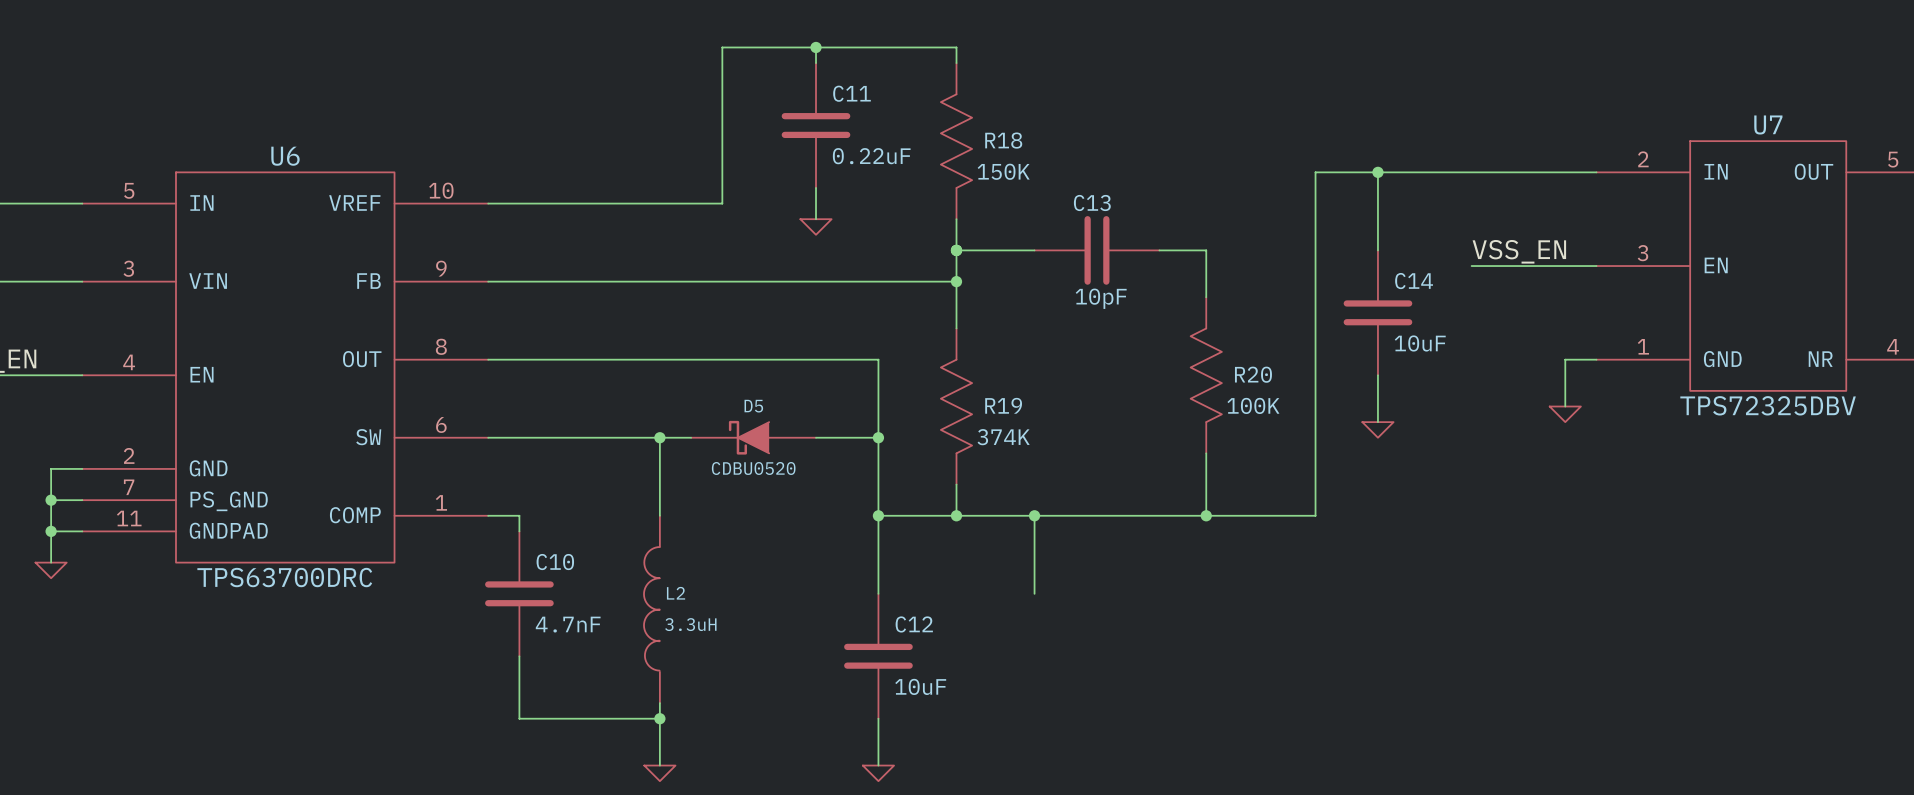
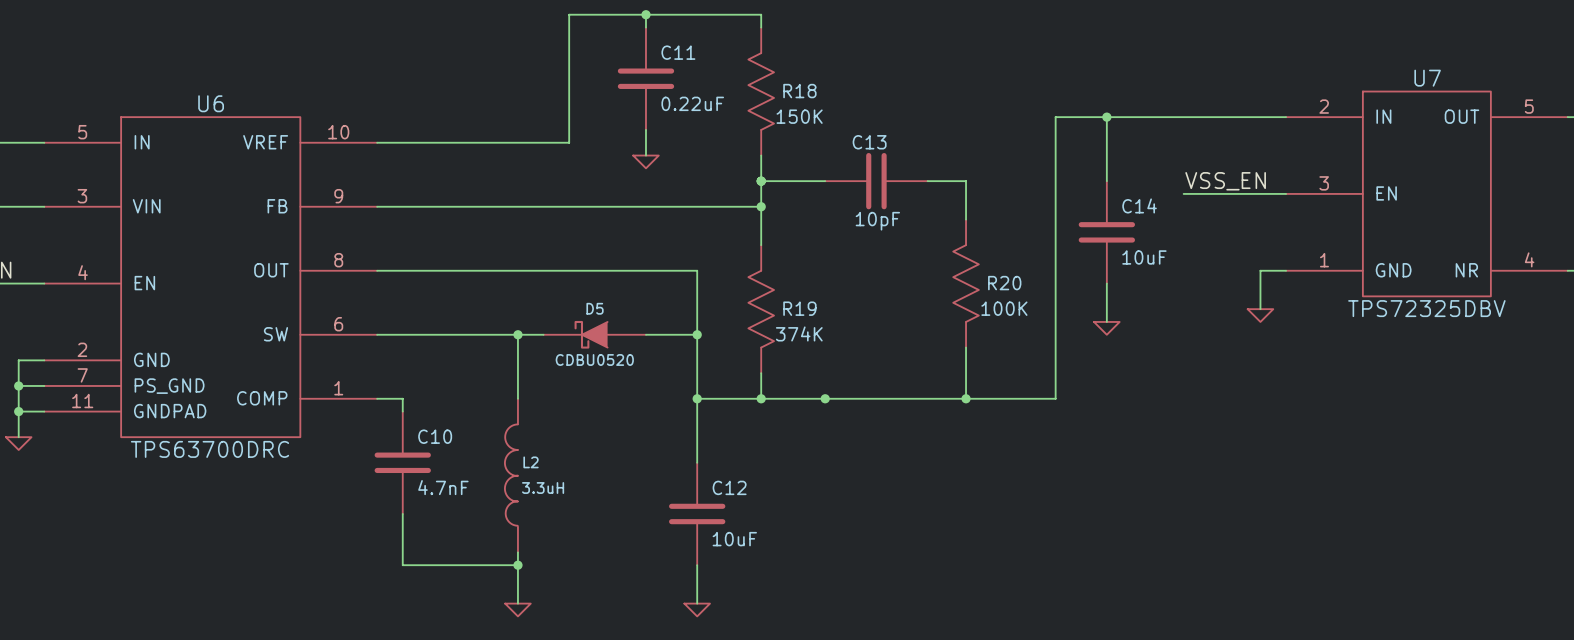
wire: (1034, 515) (1034, 593) -> none

